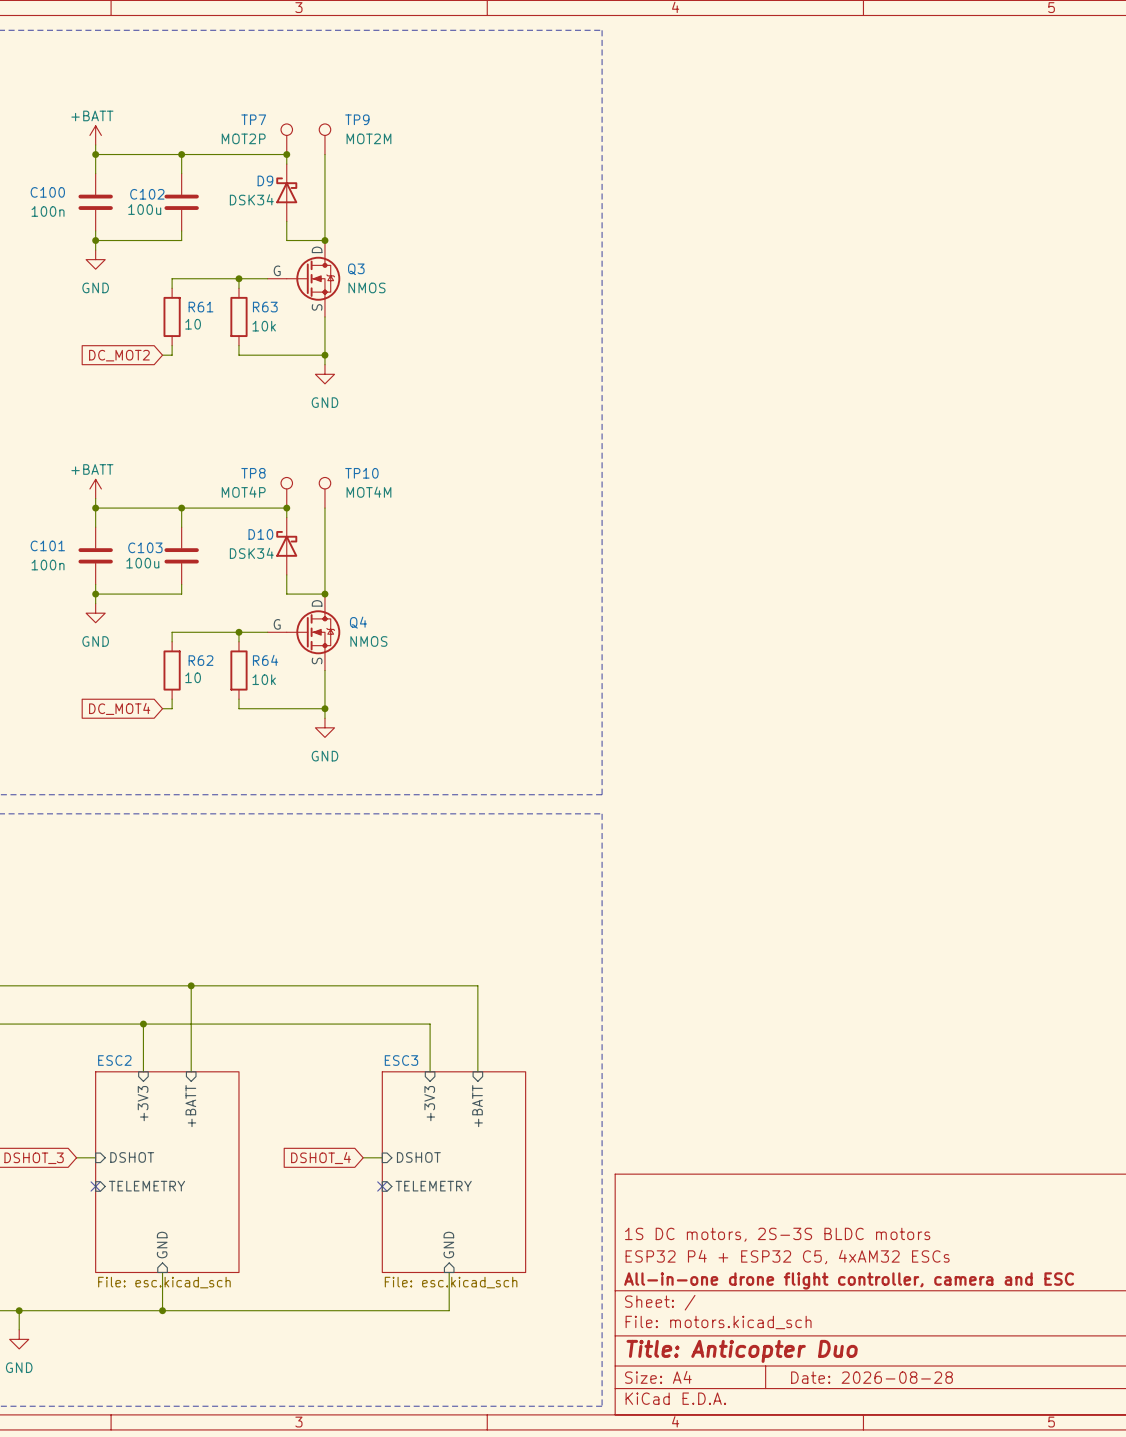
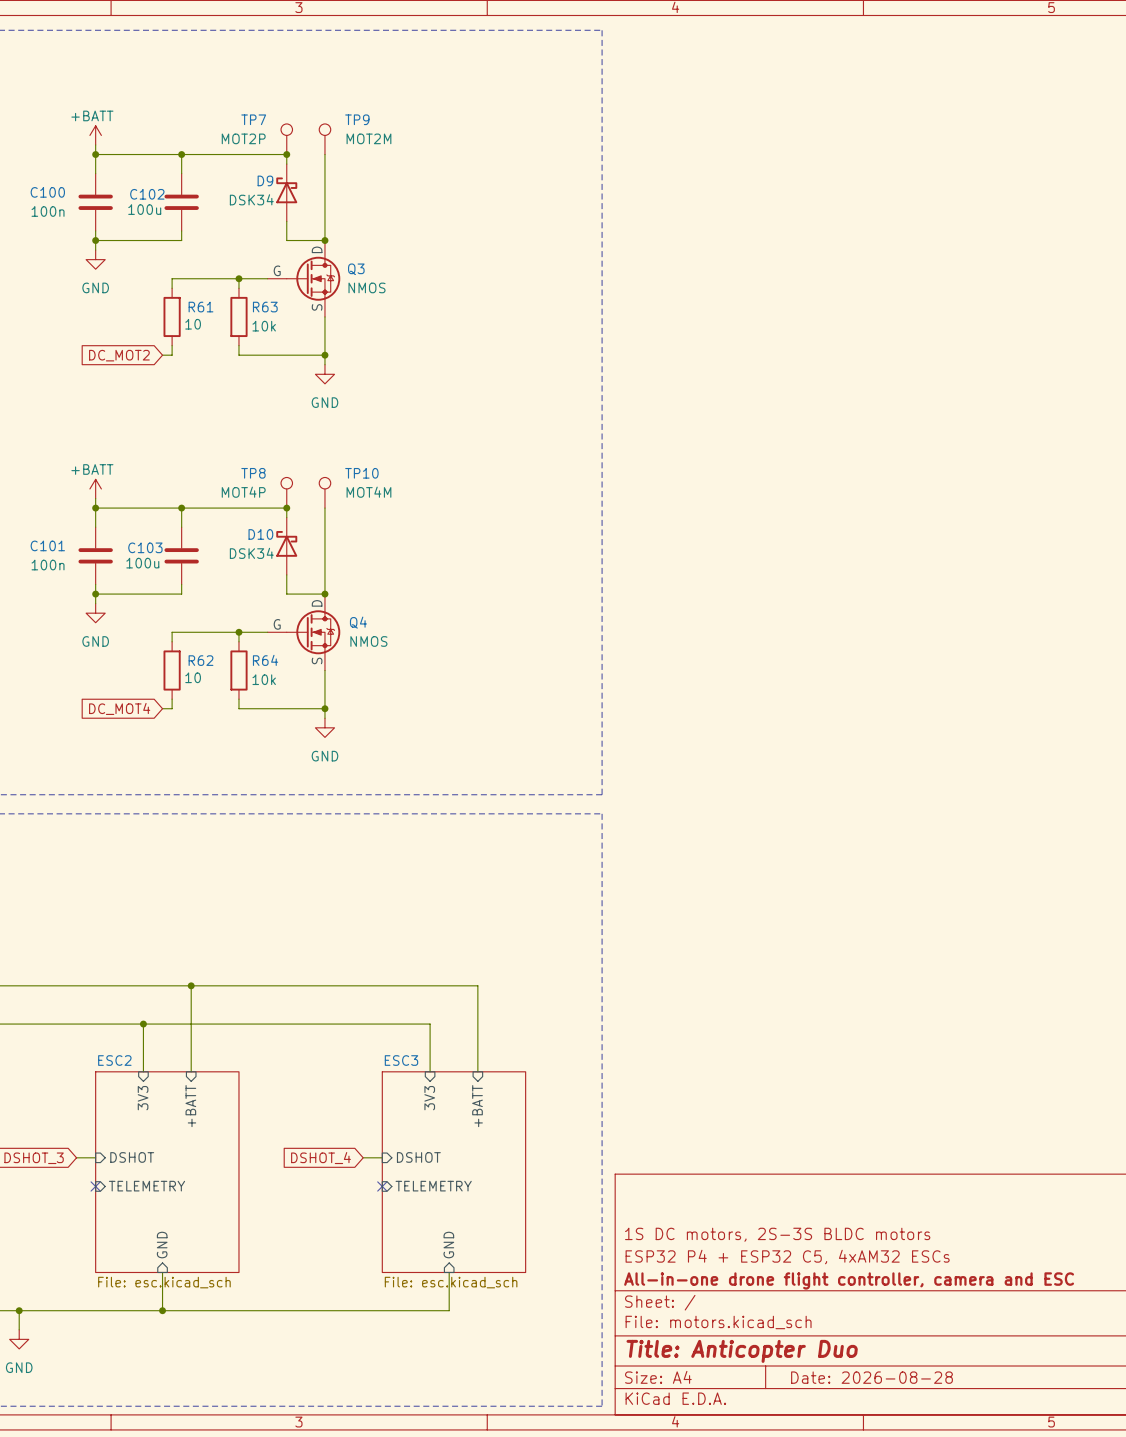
sheet pin: +3V3 (143, 1103) -> 3V3 (143, 1098)
sheet pin: +3V3 (429, 1103) -> 3V3 (429, 1098)

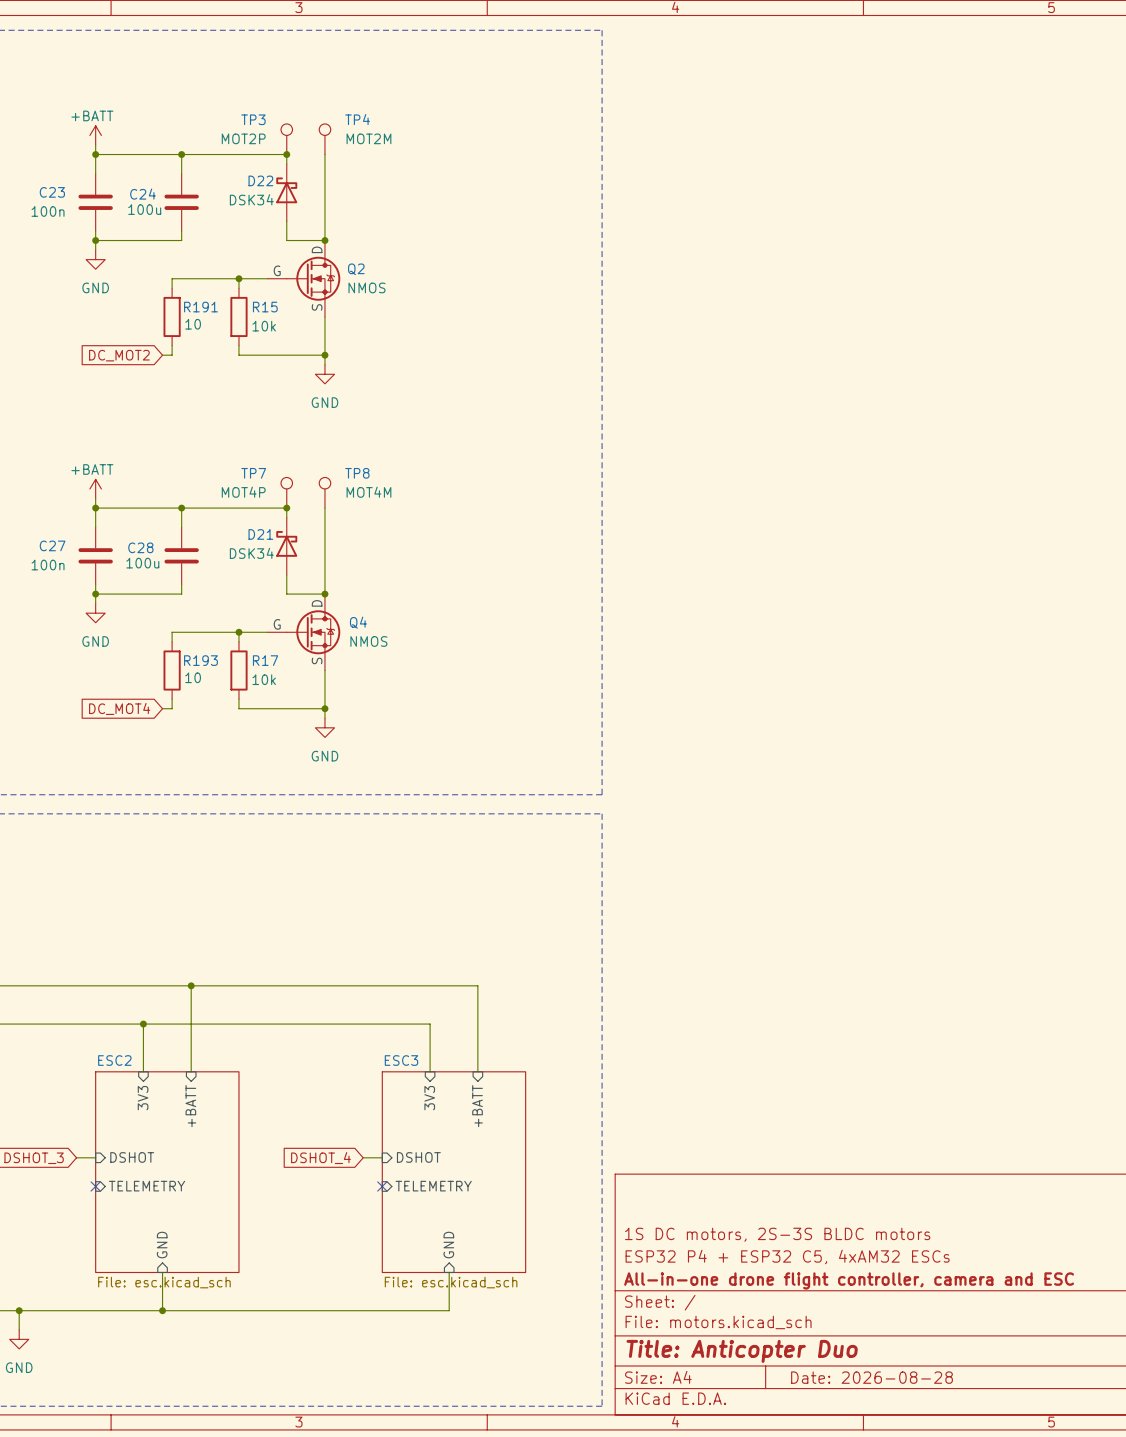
TP7 name: TP7 (253, 119) -> TP3 (253, 119)
TP9 name: TP9 (357, 119) -> TP4 (357, 119)
D9 name: D9 (265, 180) -> D22 (260, 180)
C100 name: C100 (47, 192) -> C23 (52, 192)
C102 name: C102 (147, 194) -> C24 (143, 194)
Q3 name: Q3 (356, 269) -> Q2 (356, 269)
R61 name: R61 (200, 307) -> R191 (200, 307)
R63 name: R63 (265, 307) -> R15 (265, 307)
TP8 name: TP8 (253, 473) -> TP7 (253, 473)
TP10 name: TP10 (361, 473) -> TP8 (357, 473)
D10 name: D10 (260, 534) -> D21 (260, 534)
C101 name: C101 (47, 545) -> C27 (52, 545)
C103 name: C103 (145, 547) -> C28 (140, 547)
R62 name: R62 (200, 660) -> R193 (200, 660)
R64 name: R64 (265, 660) -> R17 (265, 660)

